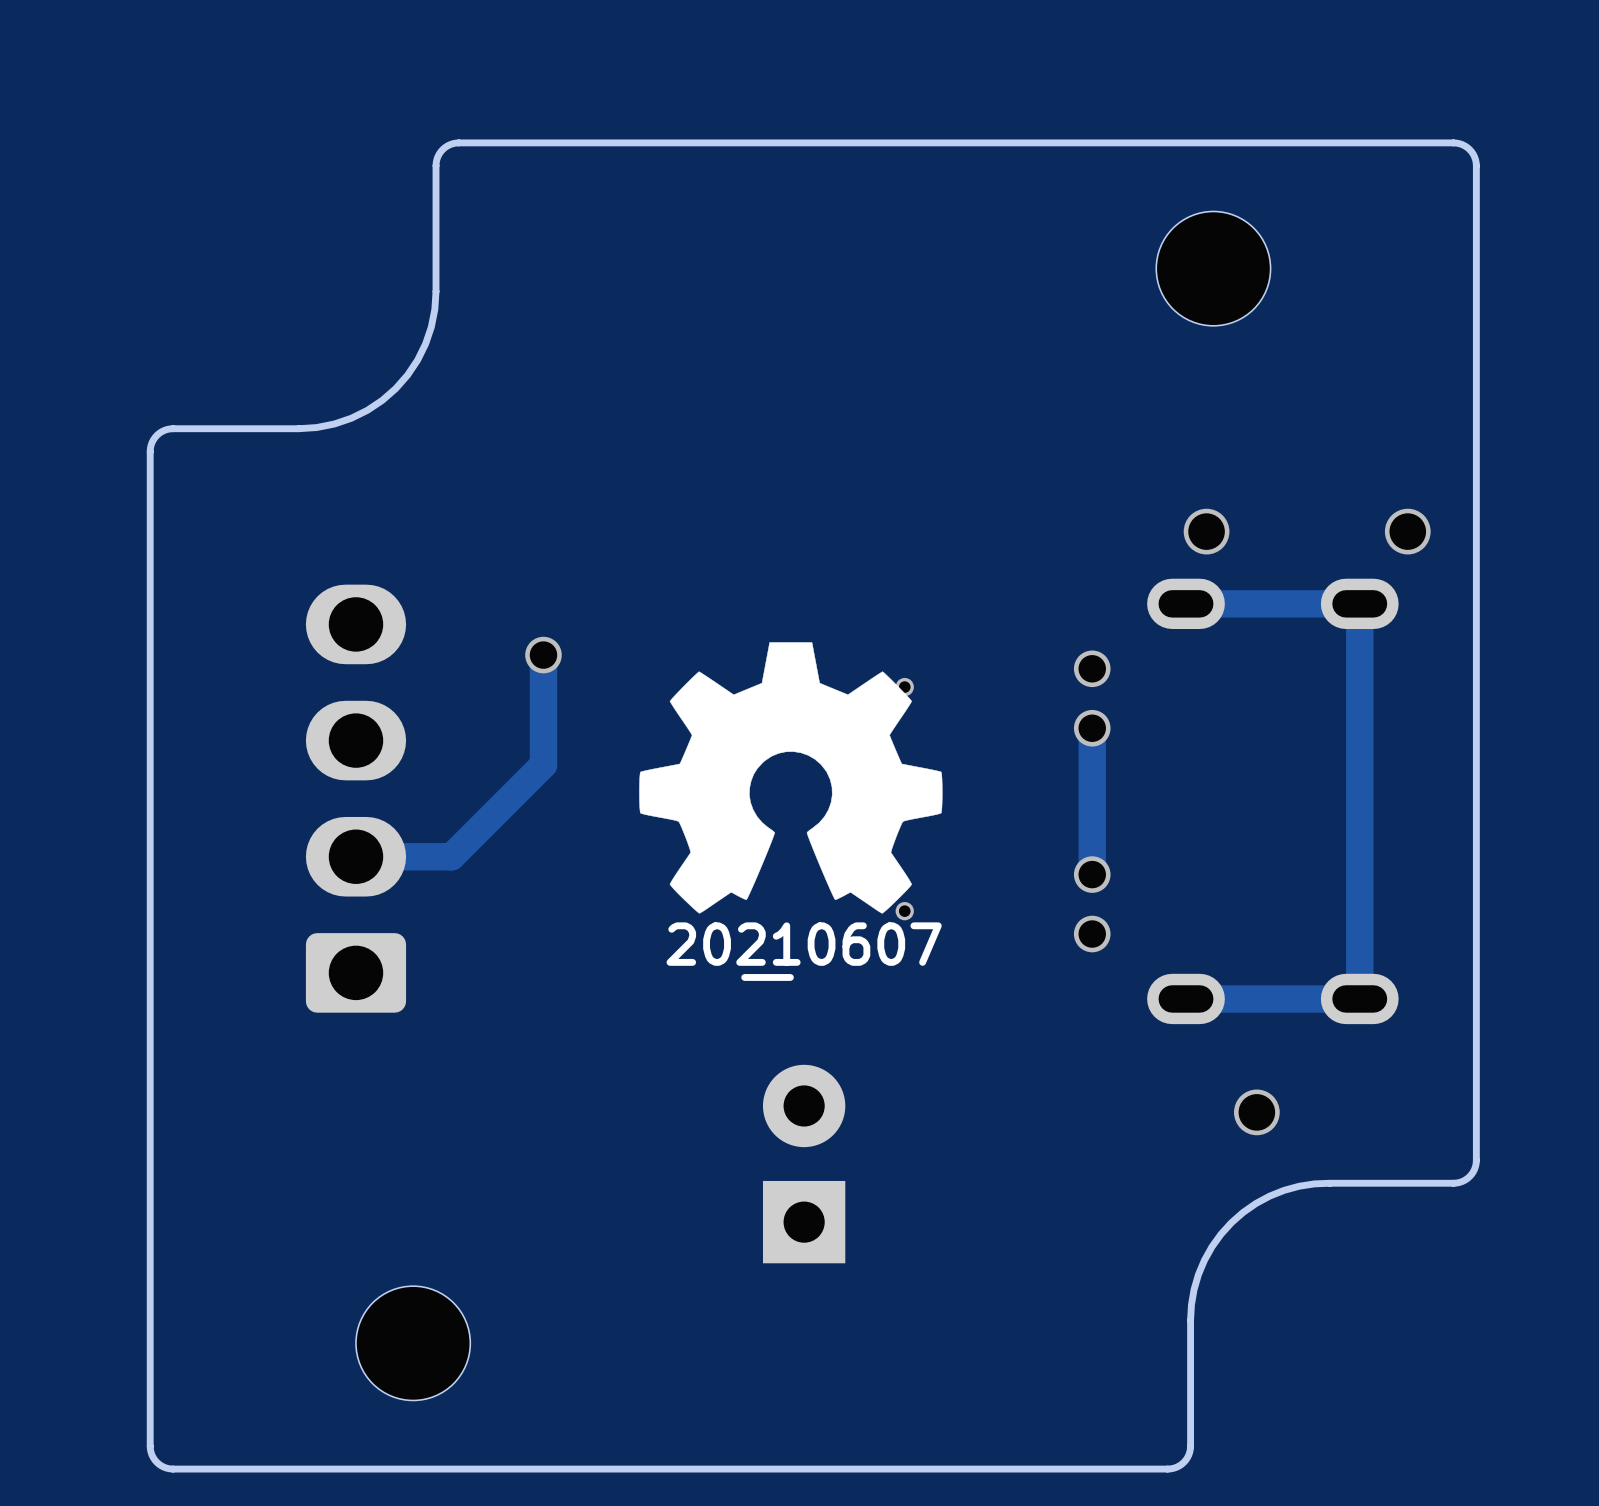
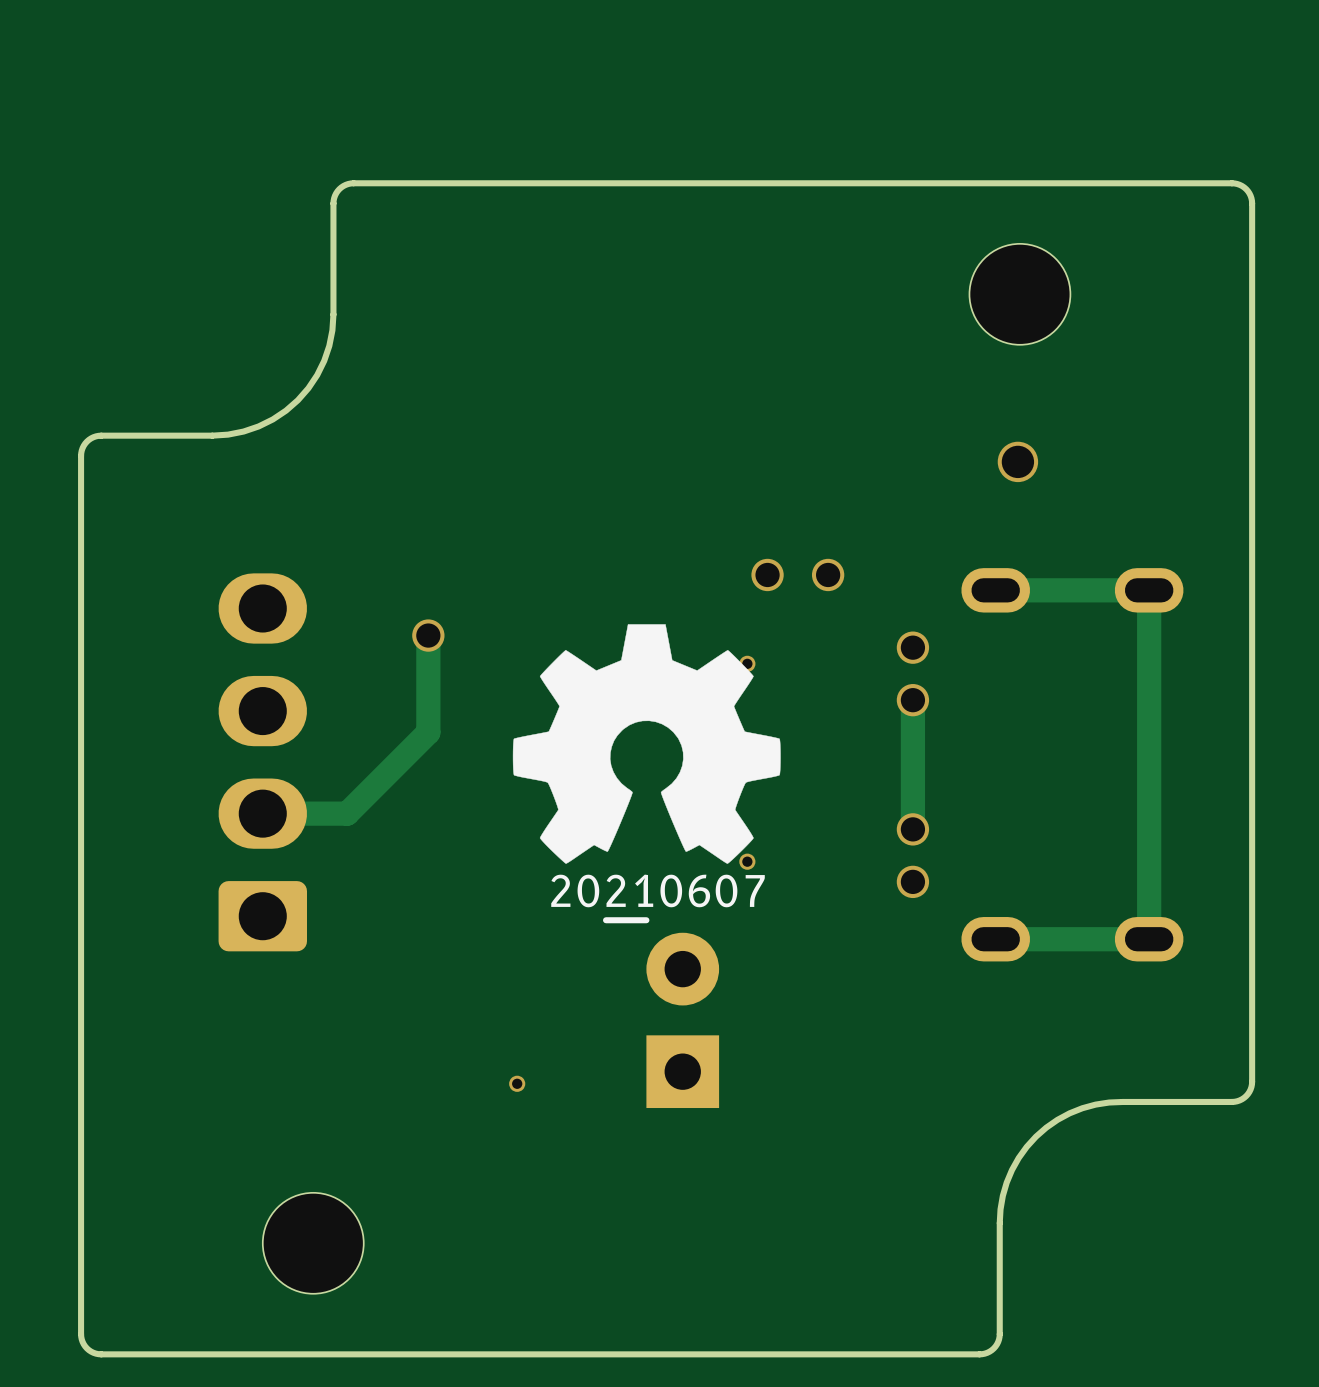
via position: (1206, 531) -> (1017, 461)
via: (1407, 531) -> none
via: none -> (767, 574)
via: none -> (828, 574)
via: (1256, 1112) -> none
via: none -> (517, 1083)
part position: (804, 1164) -> (682, 1020)

